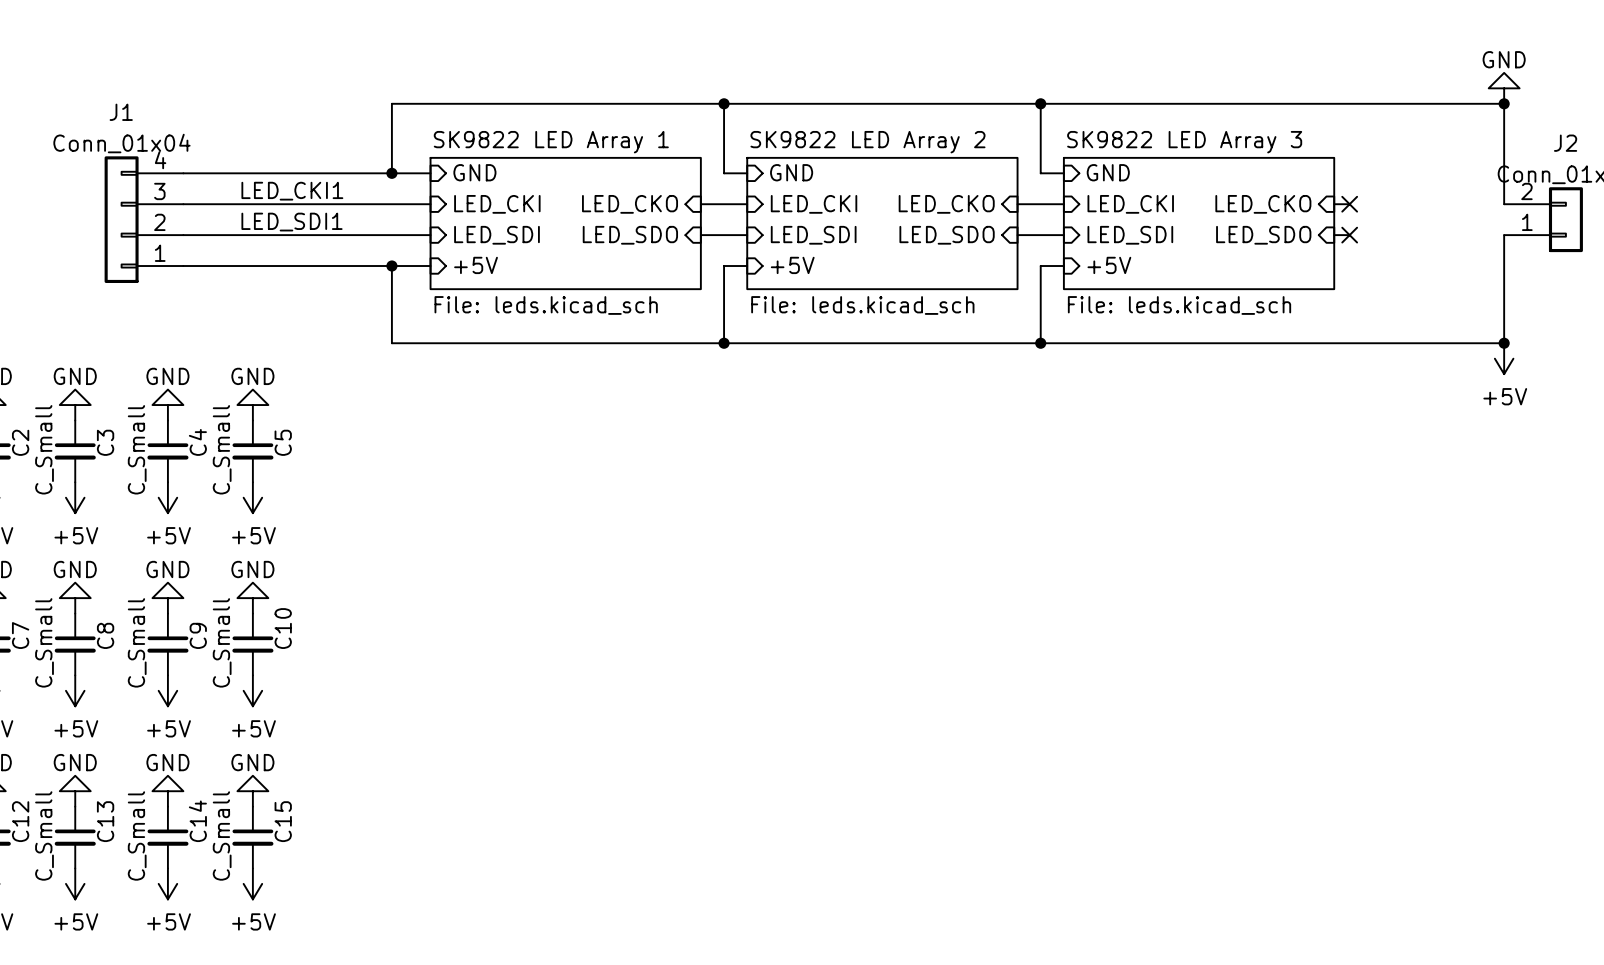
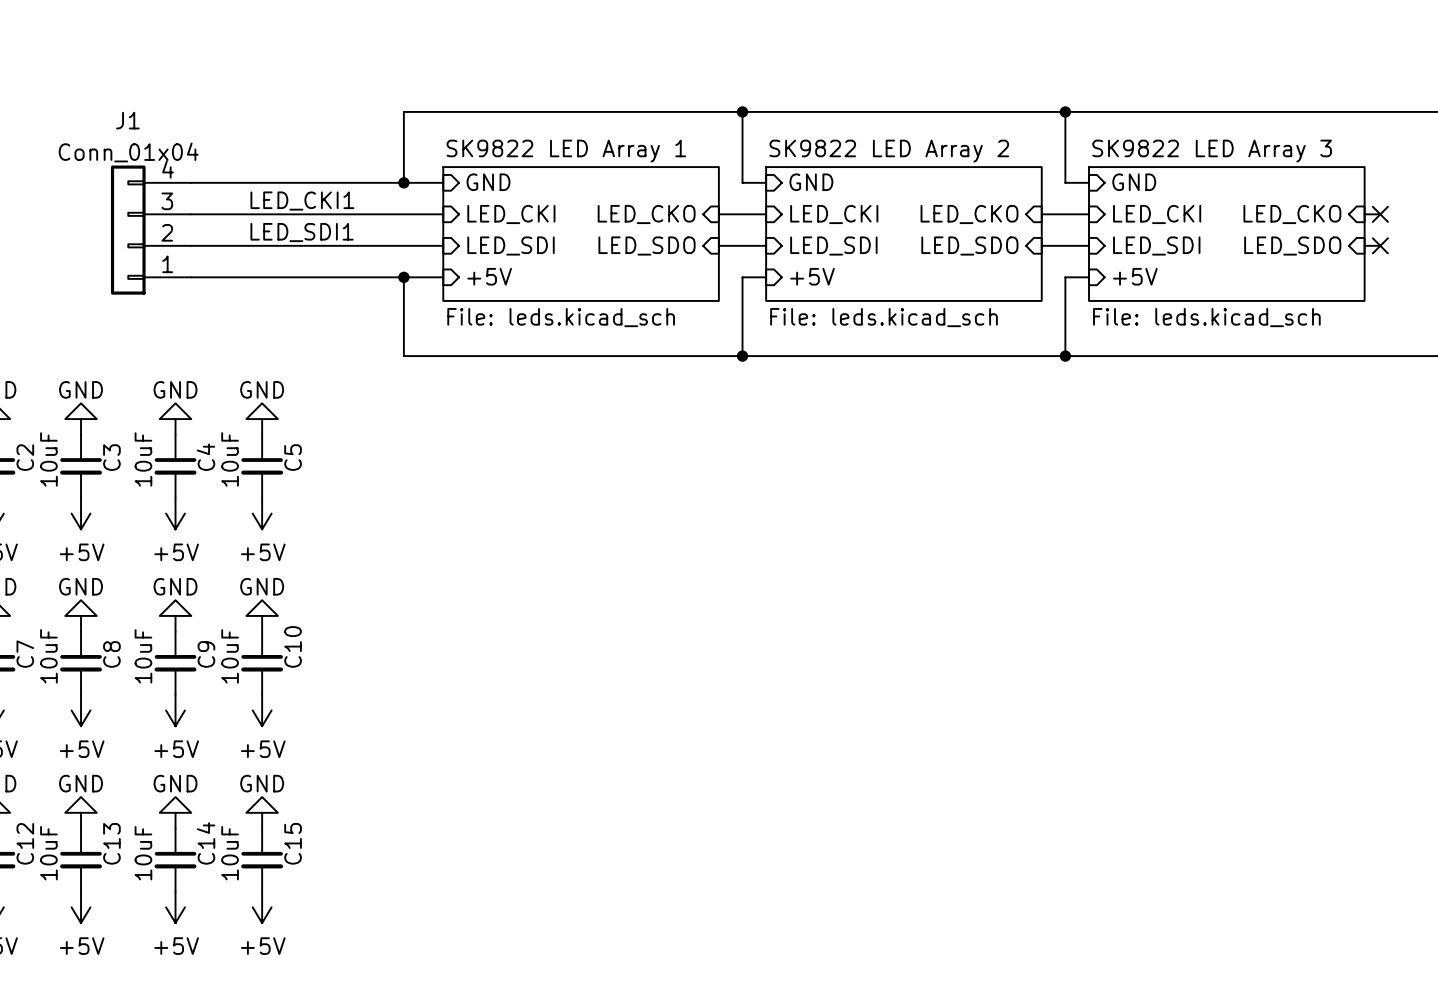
C3 value: C_Small (44, 449) -> 10uF (48, 459)
C4 value: C_Small (137, 449) -> 10uF (143, 459)
C5 value: C_Small (222, 449) -> 10uF (230, 459)
C8 value: C_Small (44, 642) -> 10uF (48, 656)
C9 value: C_Small (137, 642) -> 10uF (143, 656)
C10 value: C_Small (222, 642) -> 10uF (230, 656)
C13 value: C_Small (44, 835) -> 10uF (48, 853)
C14 value: C_Small (137, 835) -> 10uF (143, 853)
C15 value: C_Small (222, 835) -> 10uF (230, 853)

